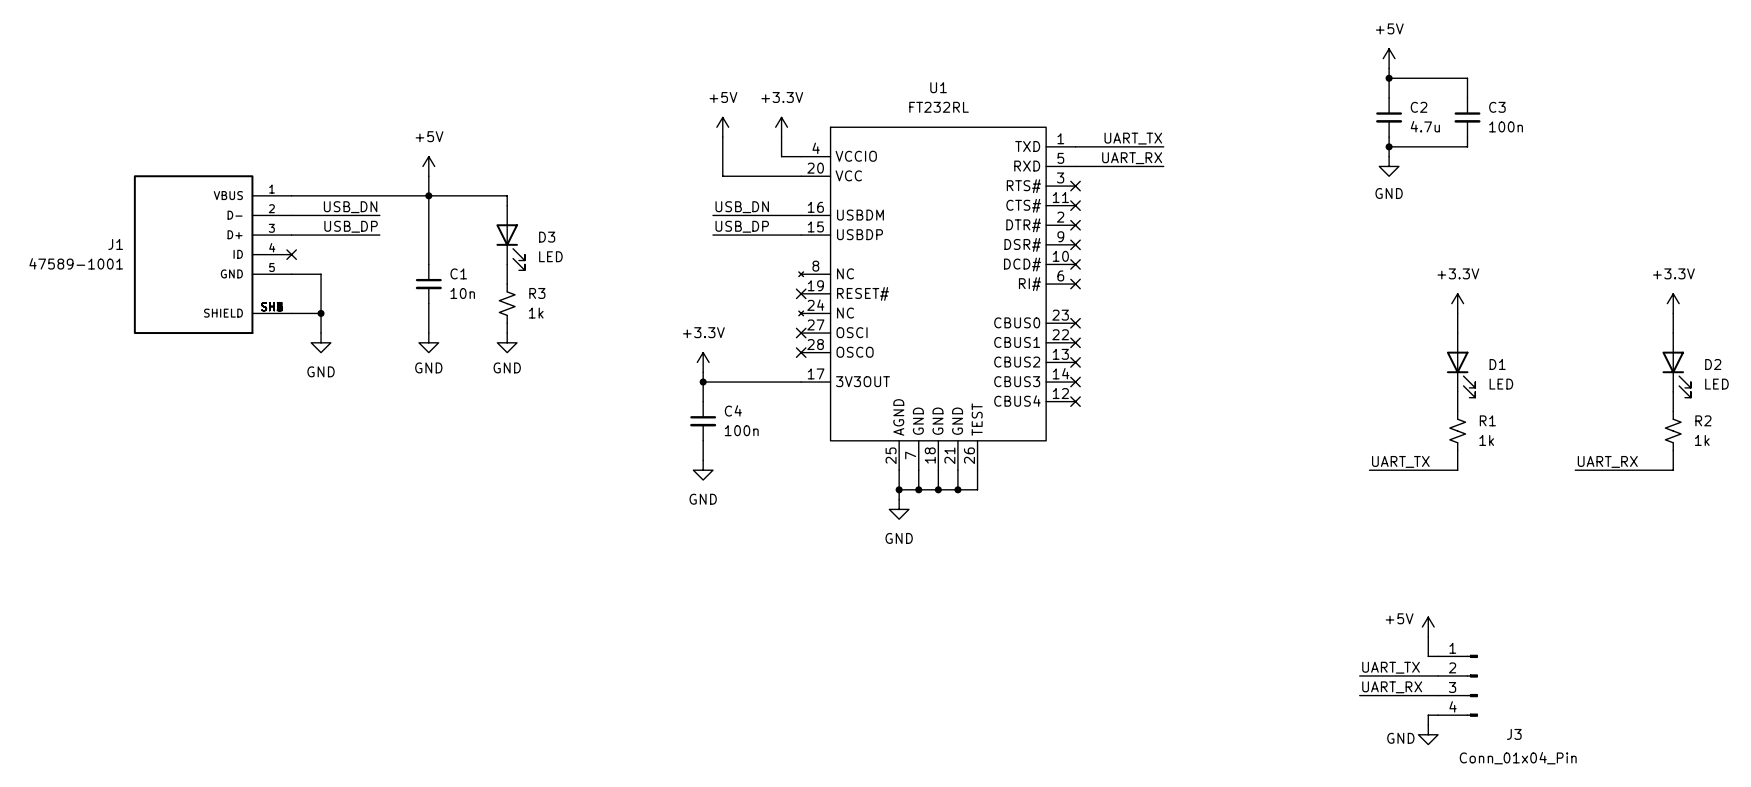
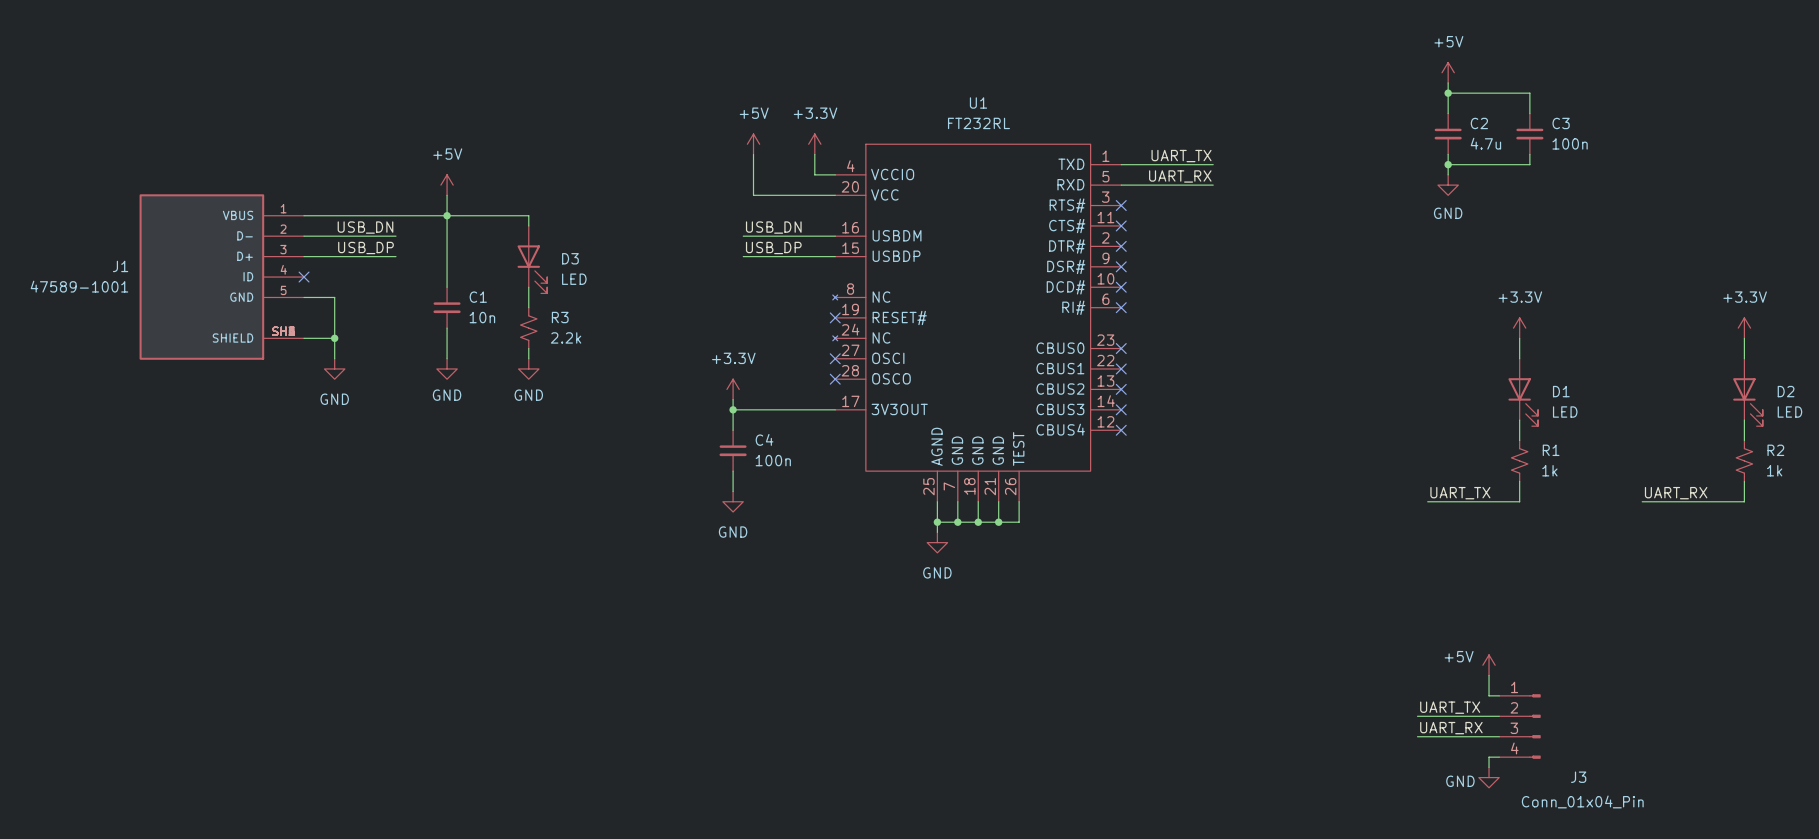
R3 value: 1k (536, 313) -> 2.2k (566, 337)

